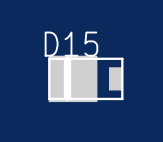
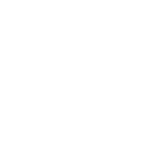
D15: (85, 78) -> none

